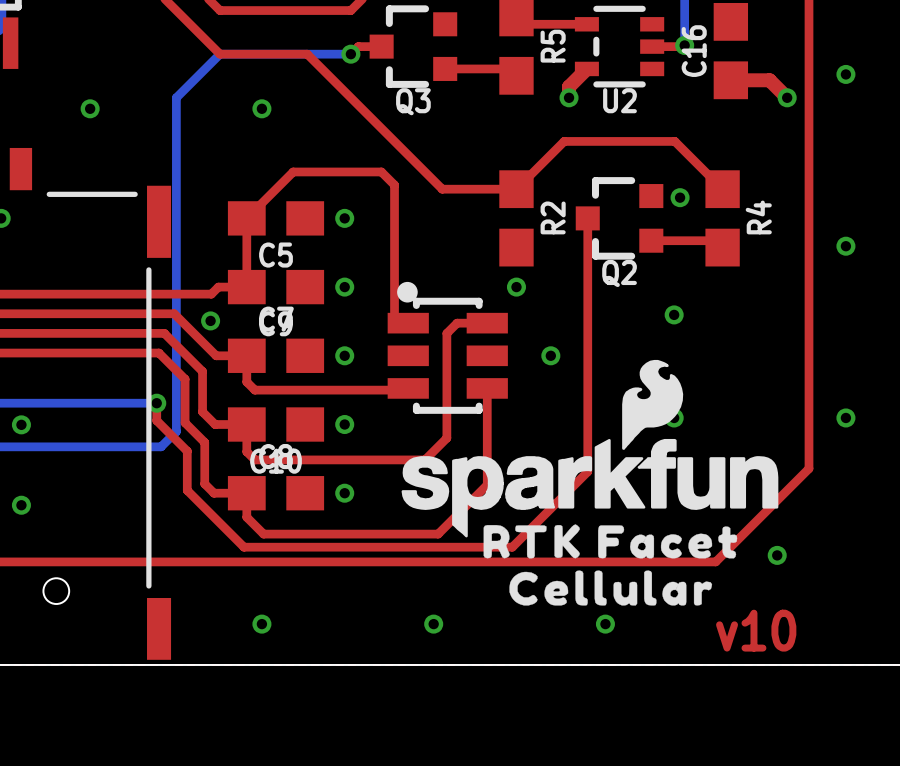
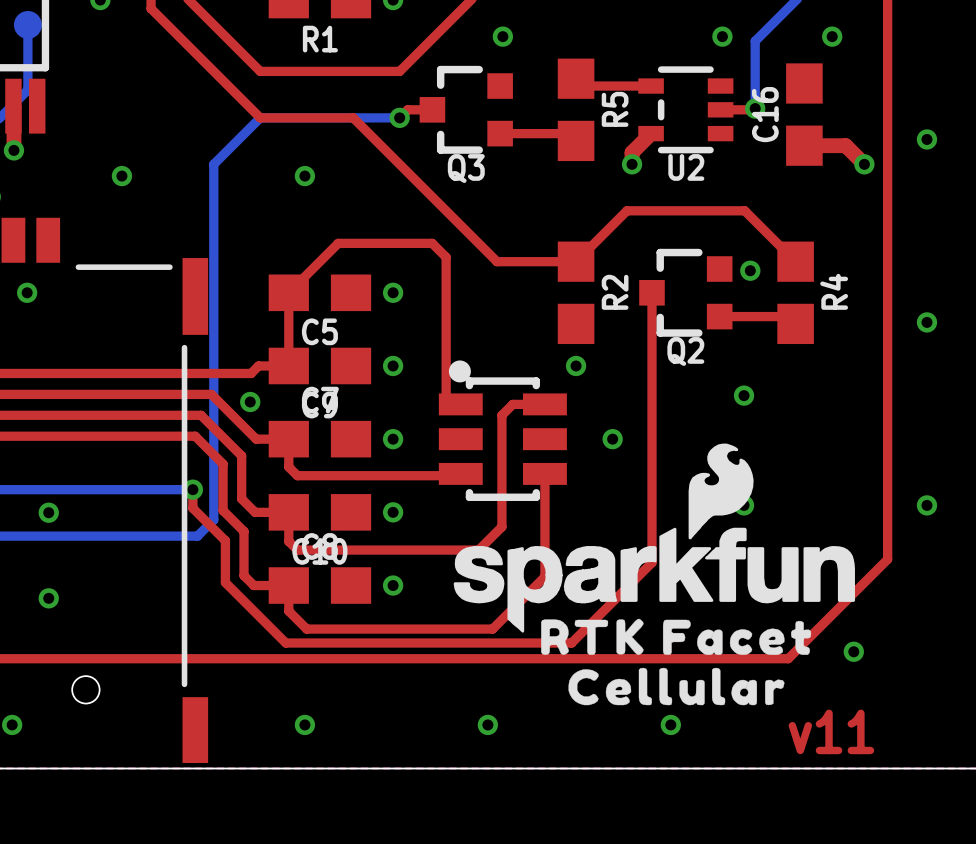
text: v10 (756, 630) -> v11 (831, 731)

